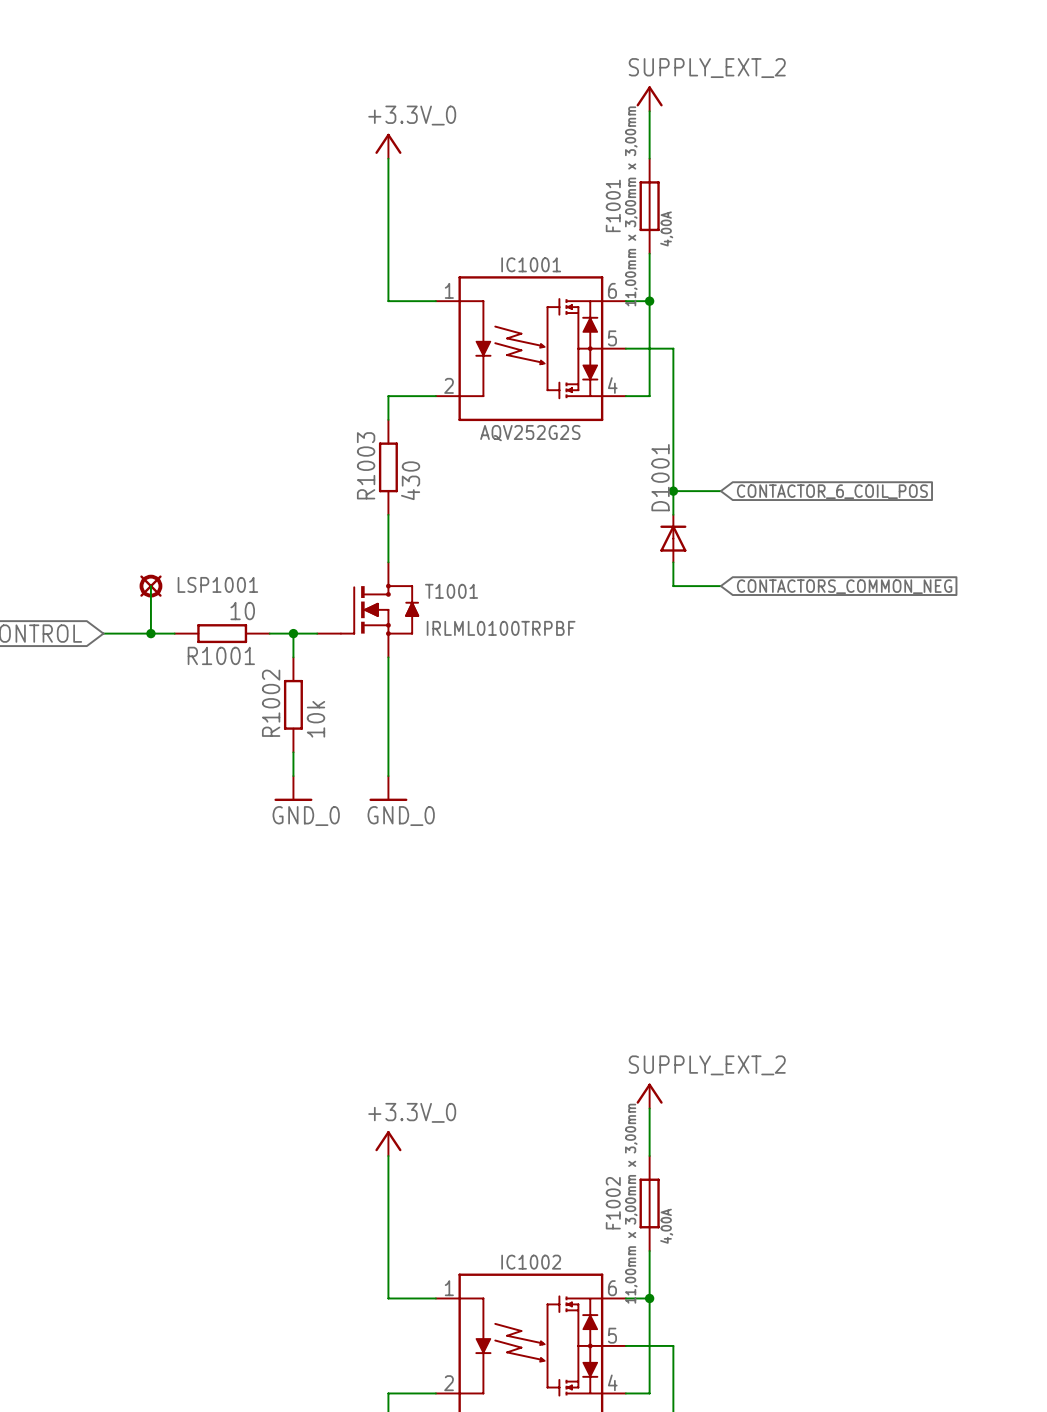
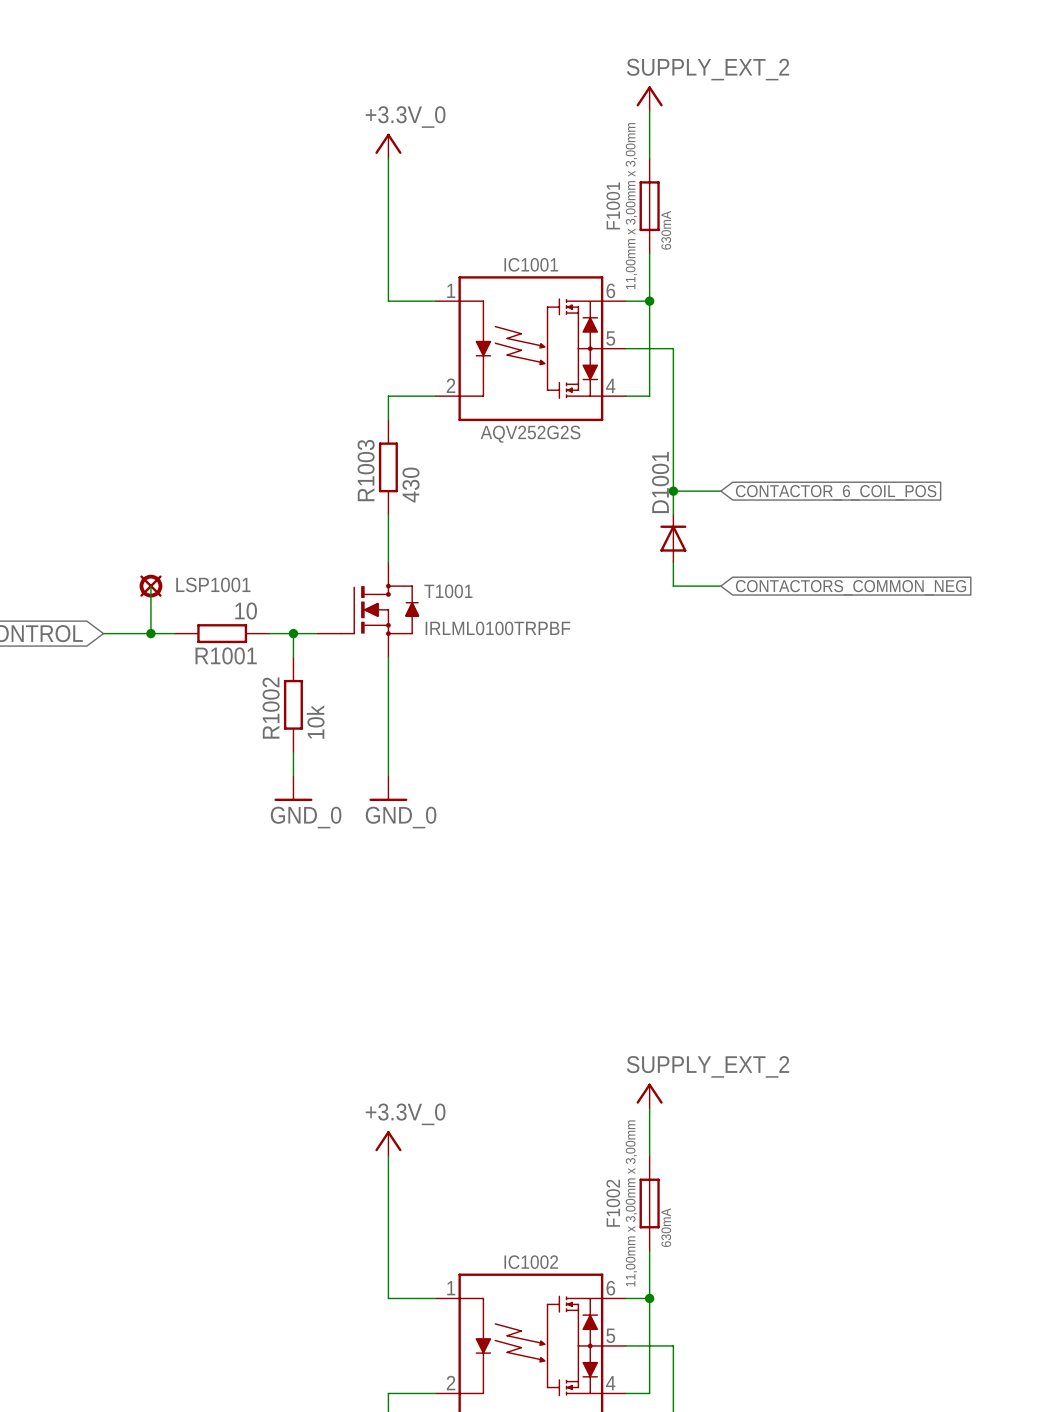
F1001 text: 4,00A (666, 228) -> 630mA (666, 230)
F1002 text: 4,00A (666, 1226) -> 630mA (666, 1227)

